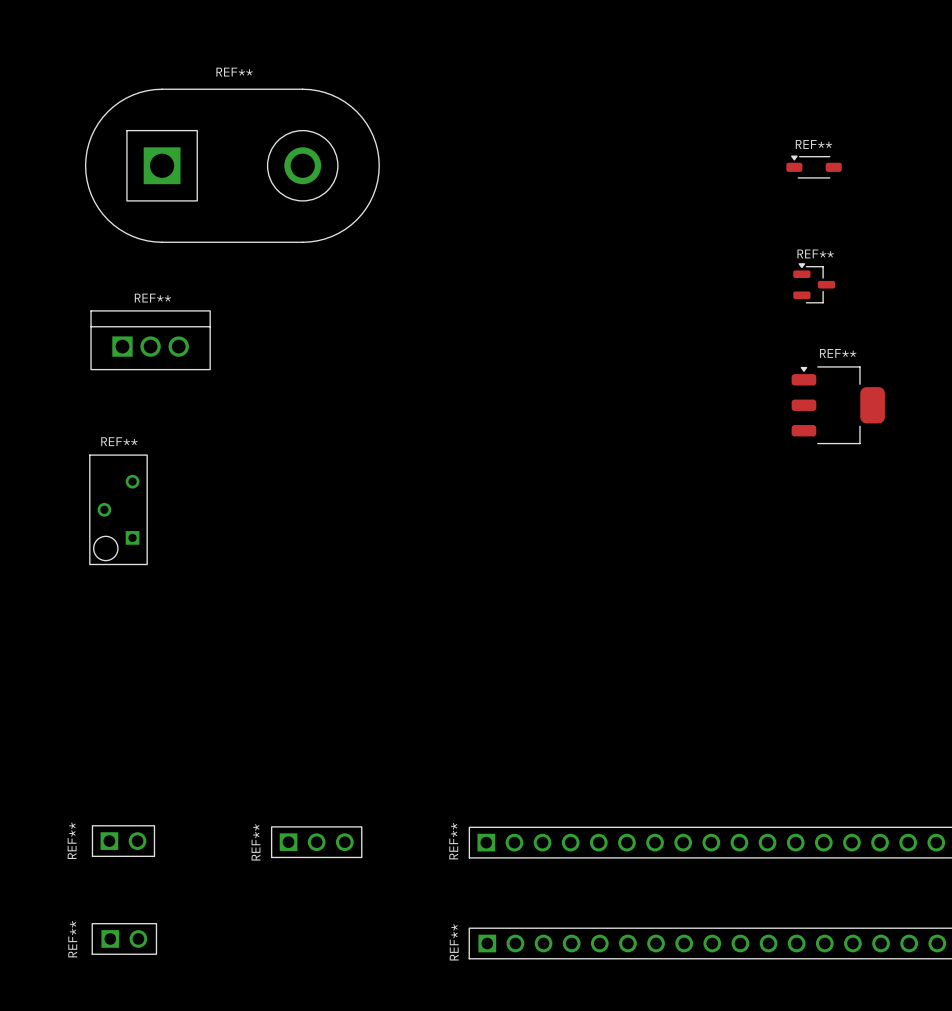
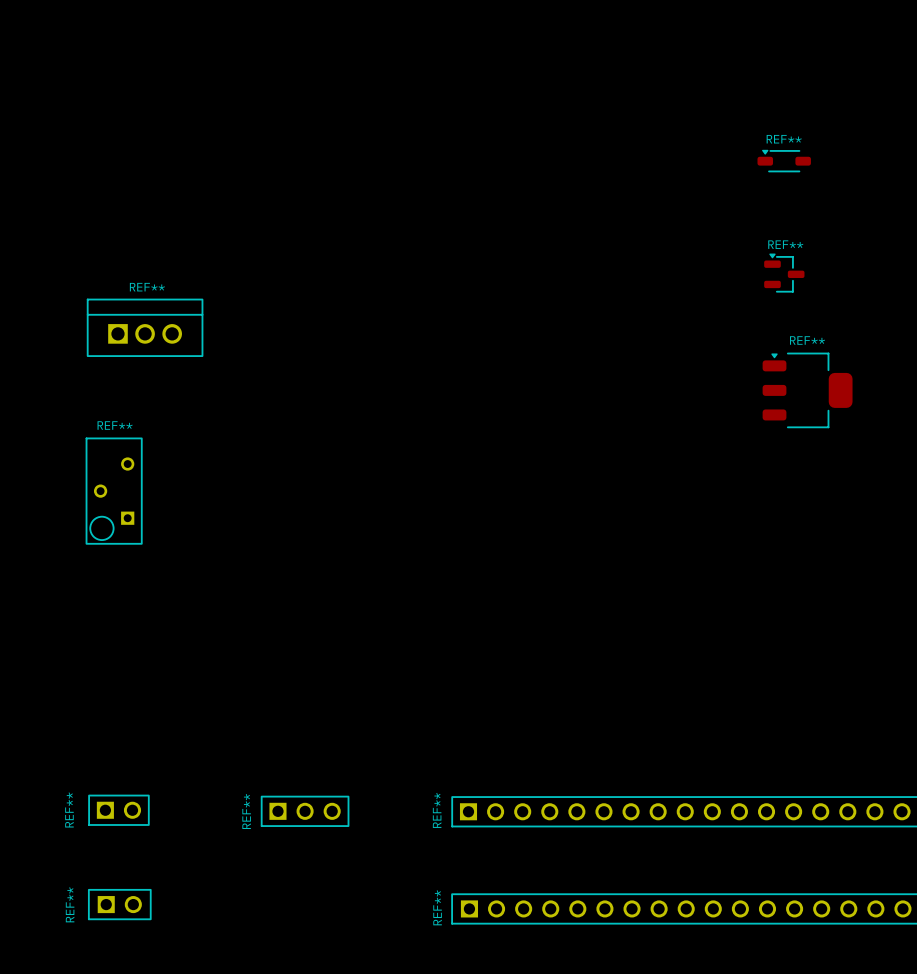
REF**: (232, 165) -> none

